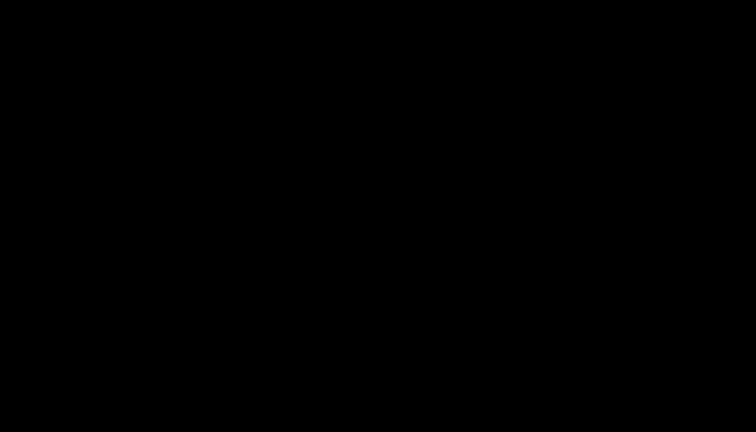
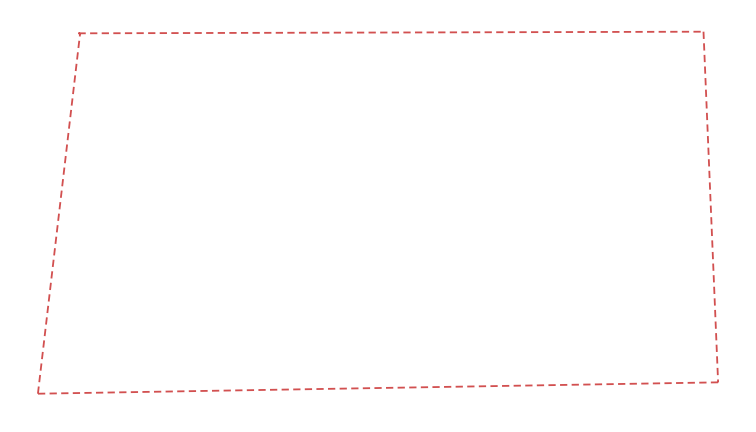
top zone outline: none -> (703, 31) (78, 33) (80, 33) (37, 393) (718, 382) (703, 31)

